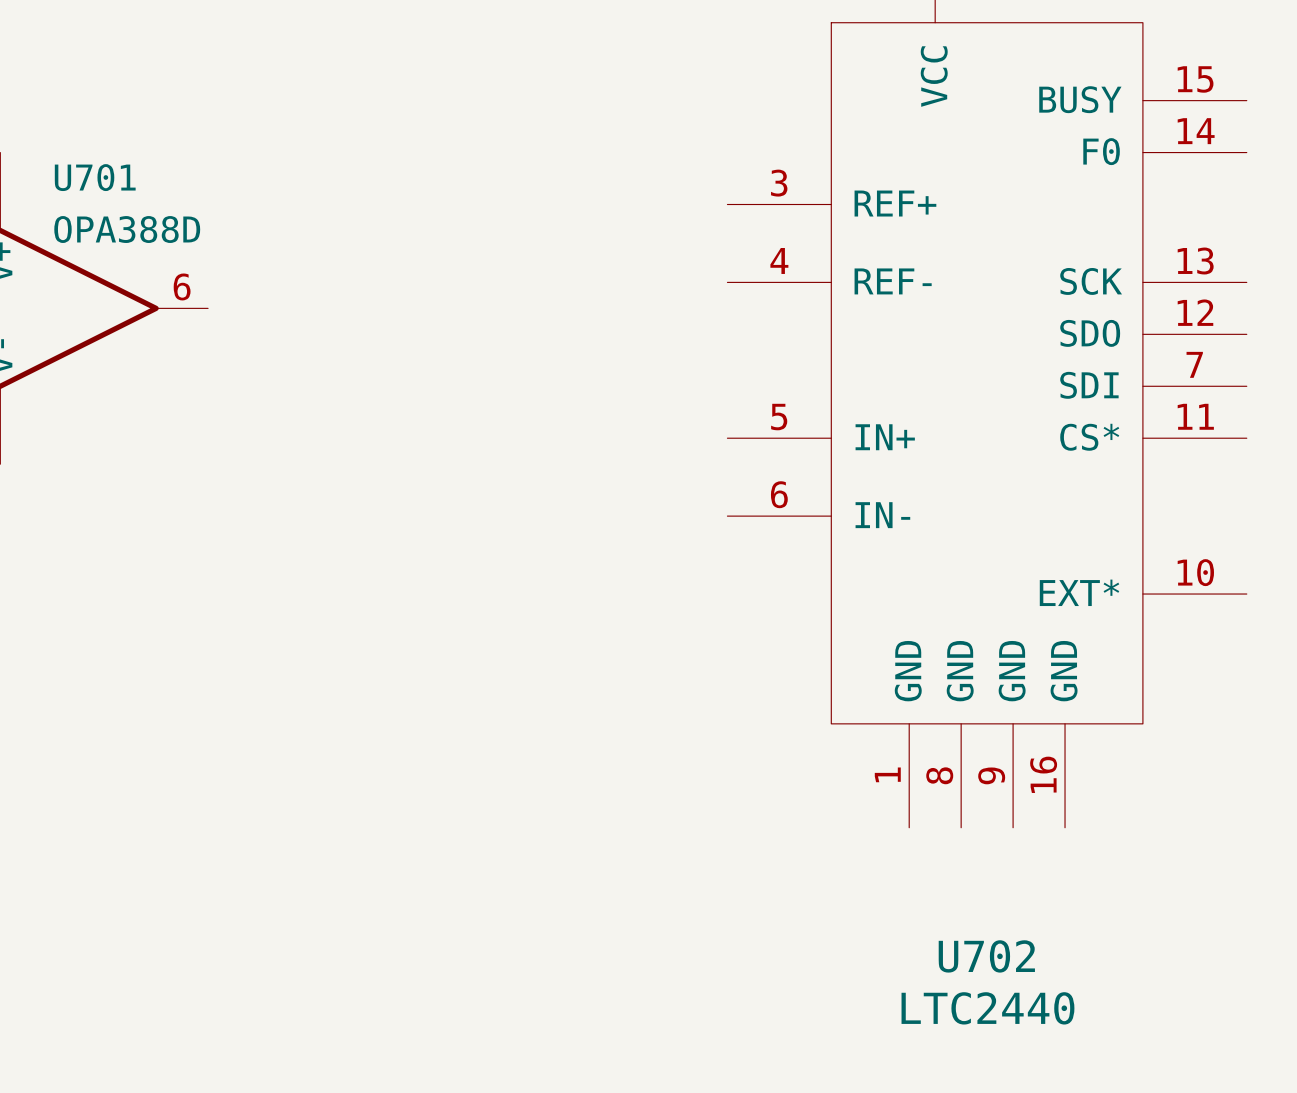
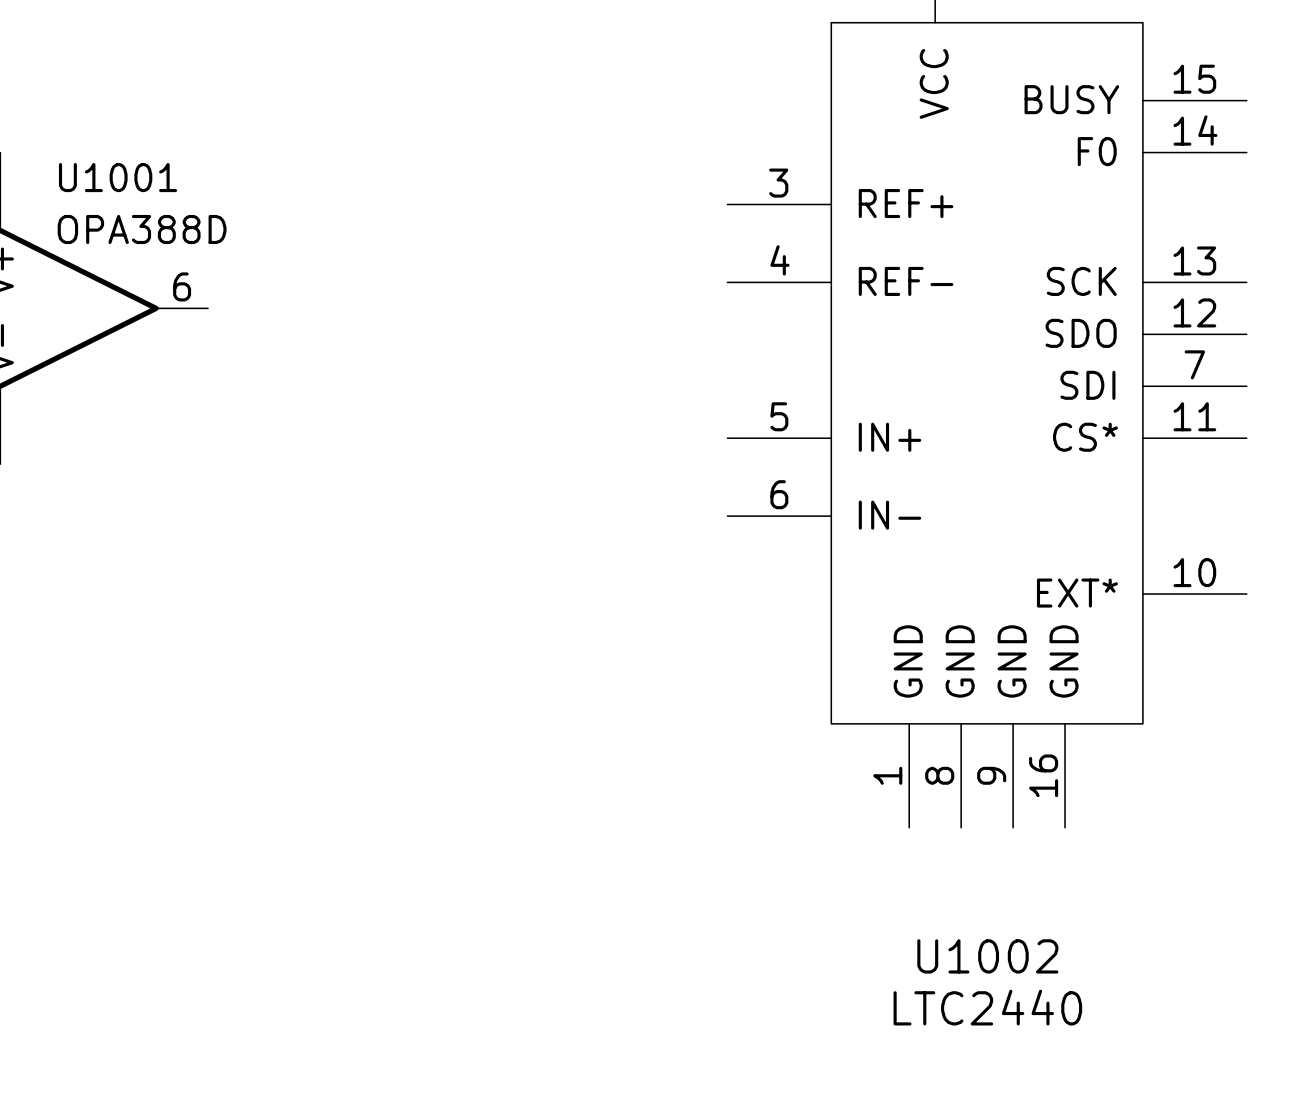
U701 name: U701 (95, 177) -> U1001 (117, 177)
U702 name: U702 (986, 956) -> U1002 (987, 956)

